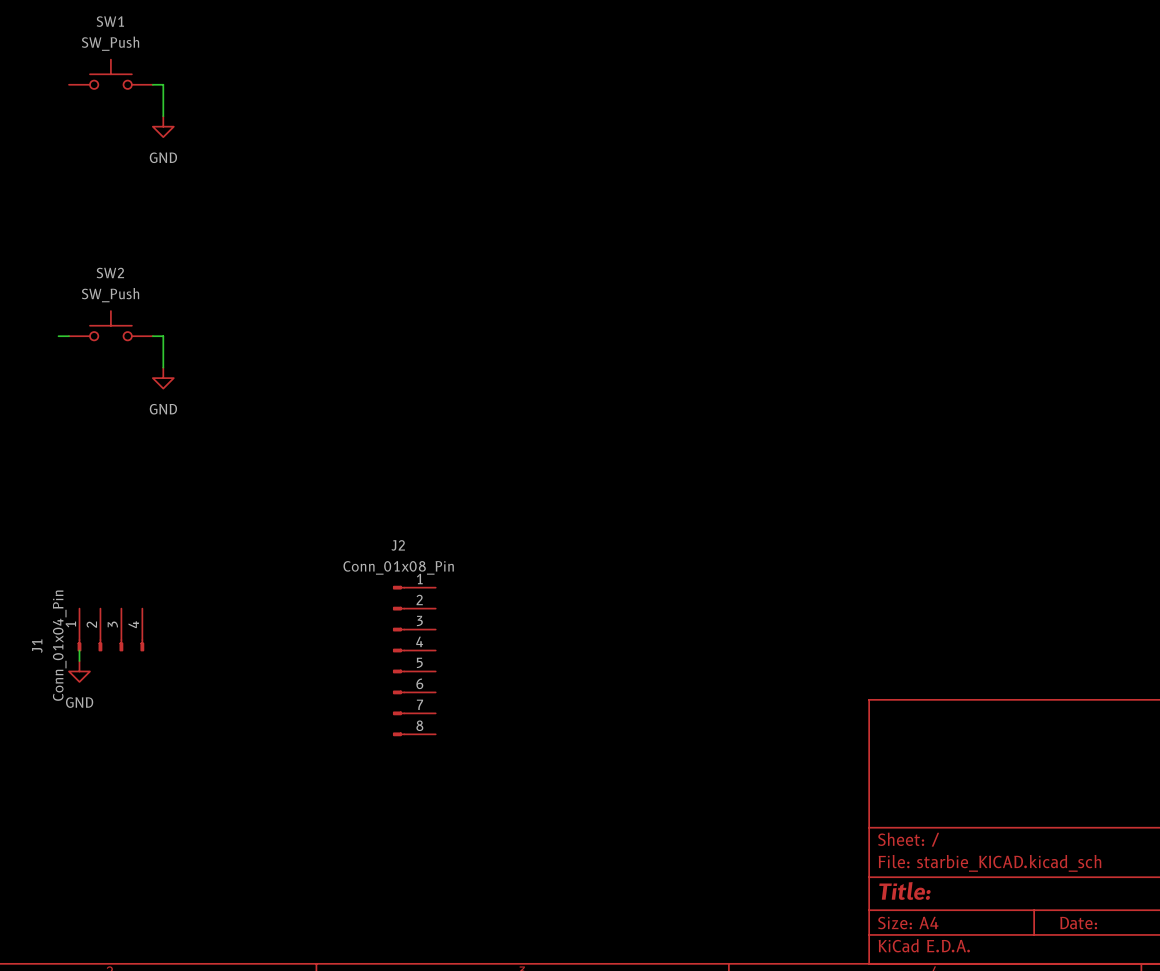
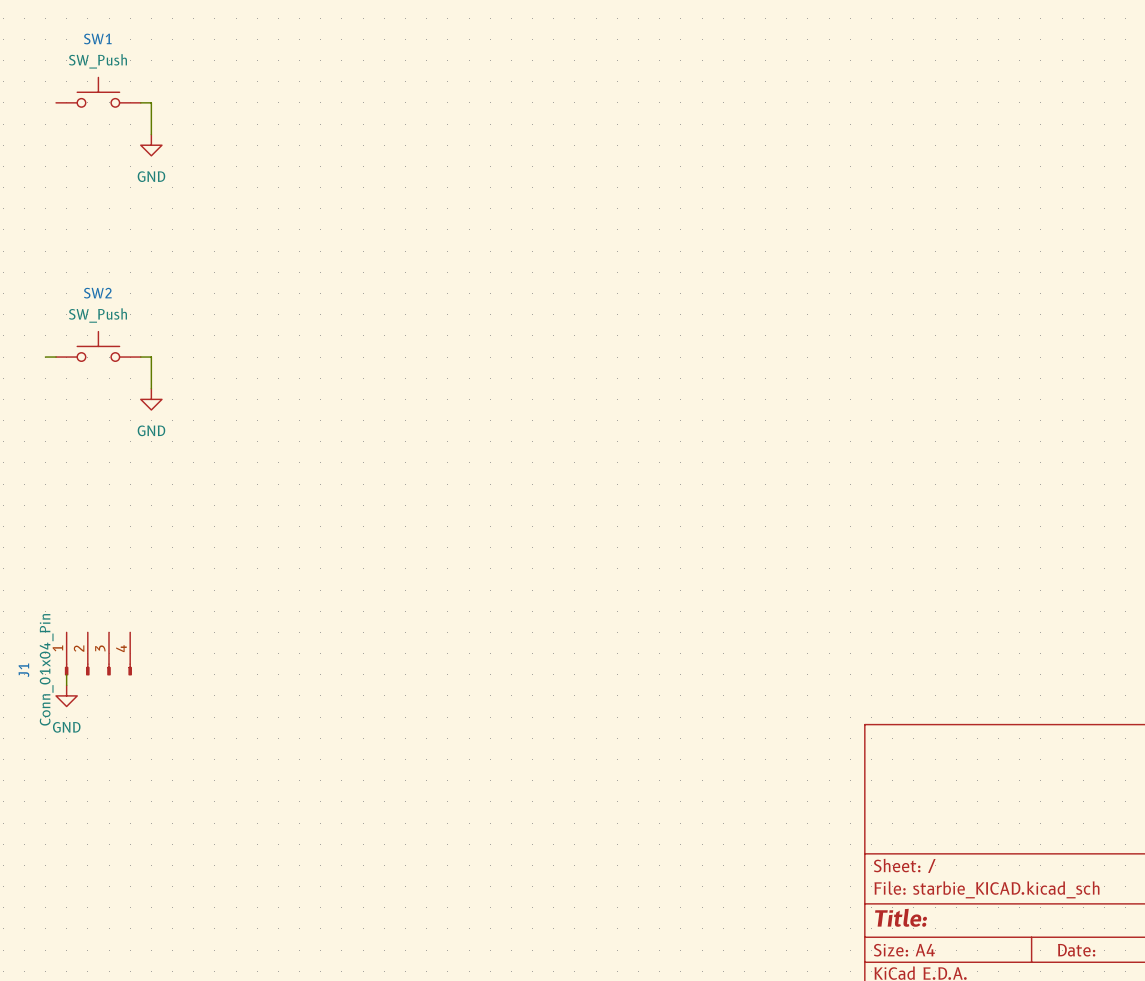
J2: Conn_01x08_Pin (414, 660) -> none

